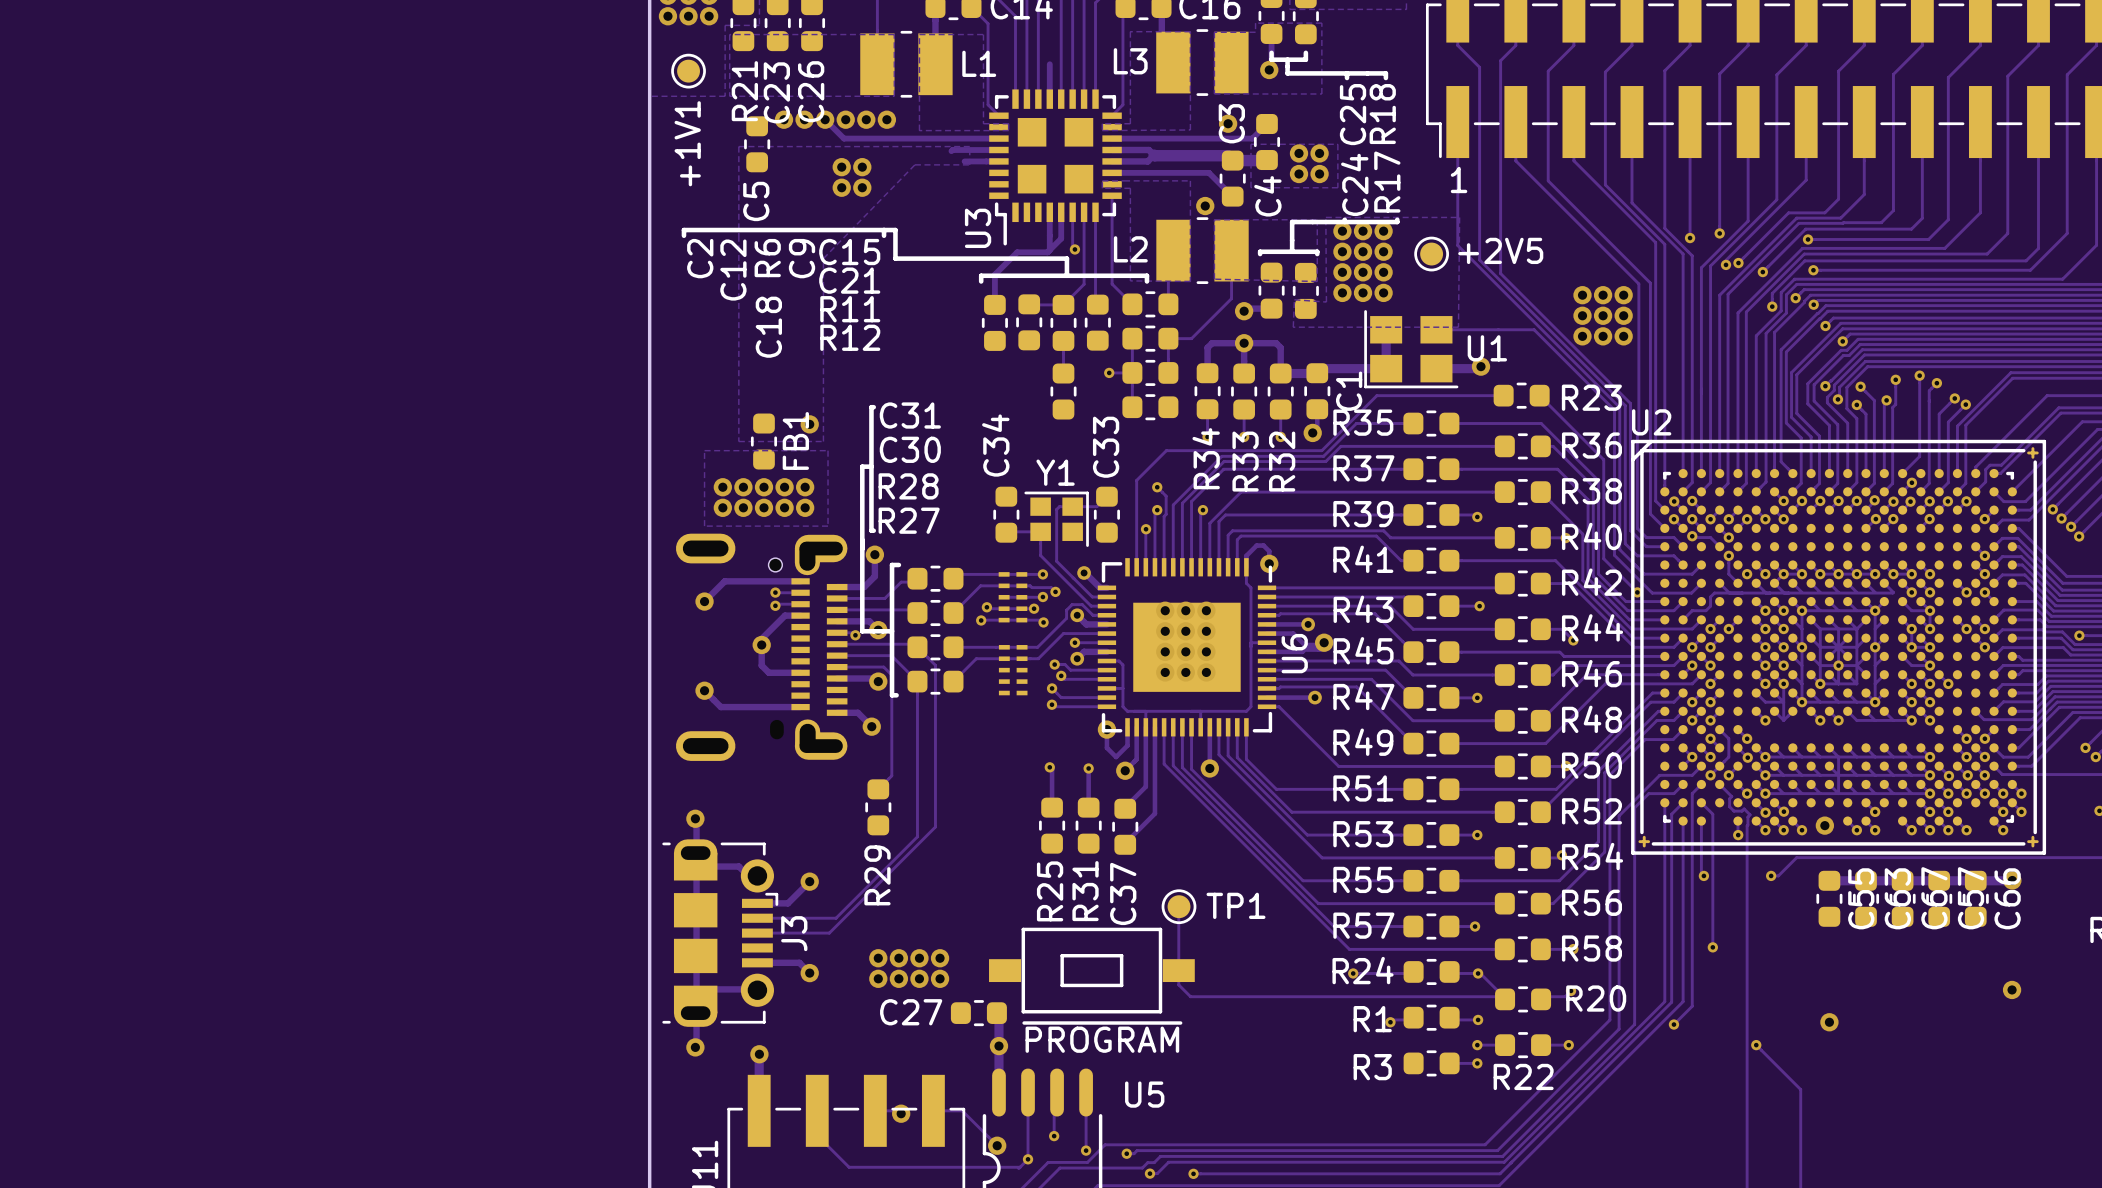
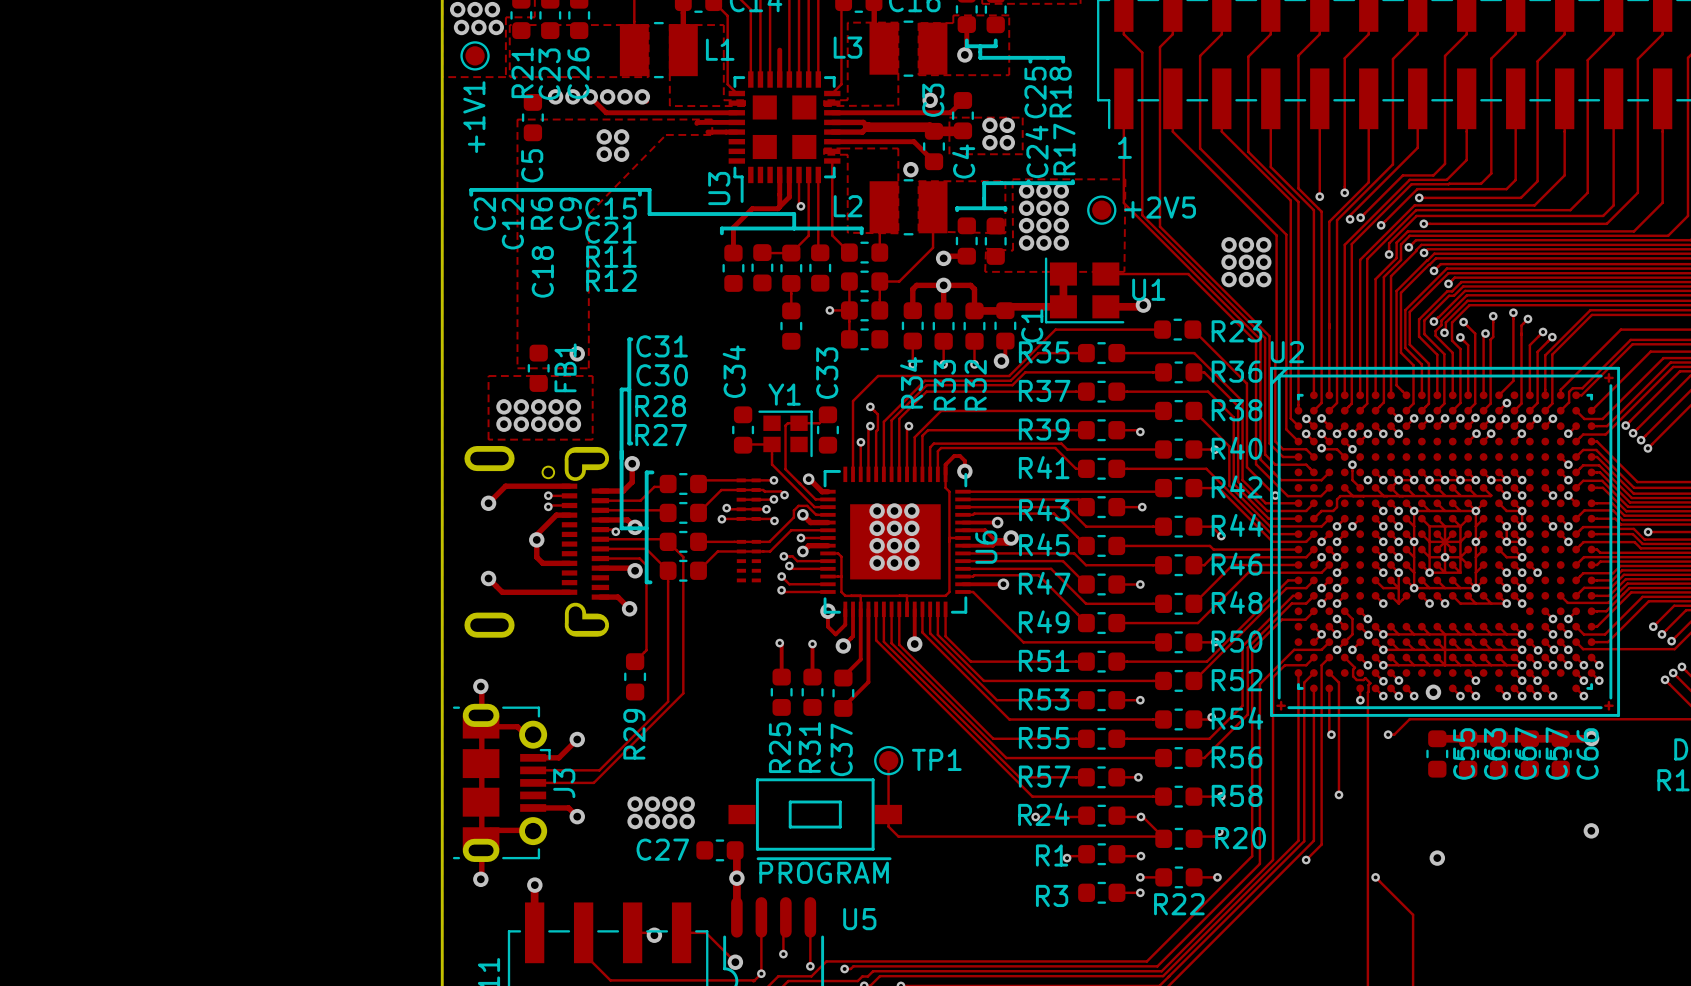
via: none -> (461, 27)
via: none -> (478, 27)
via: none -> (496, 27)

